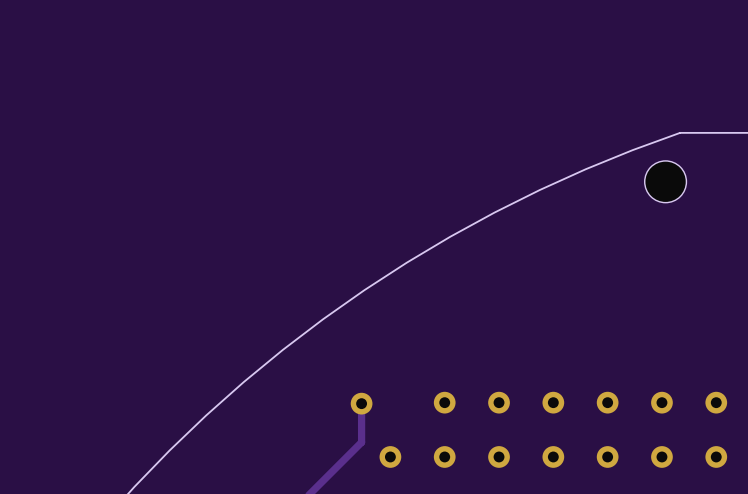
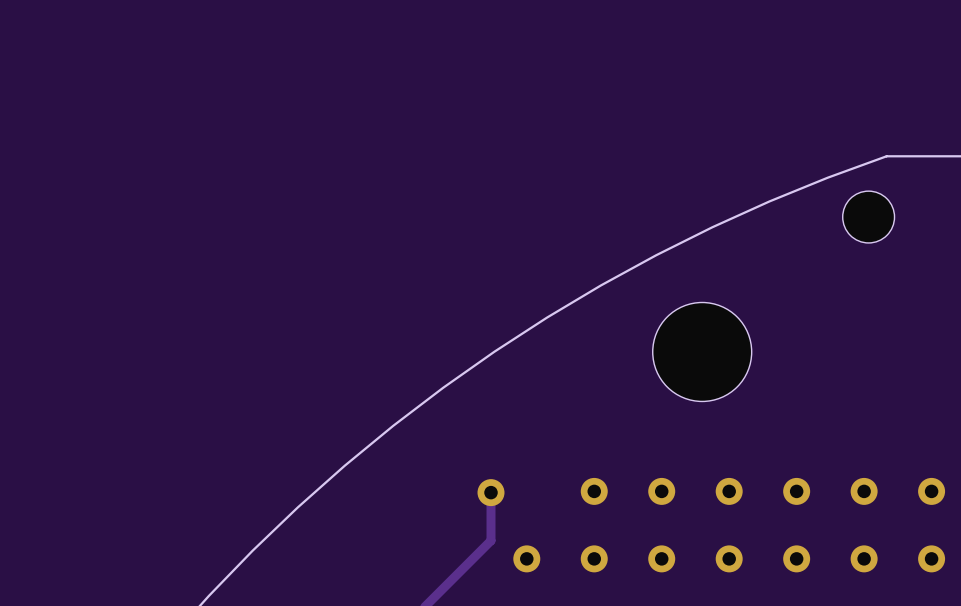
part: none -> (702, 351)

